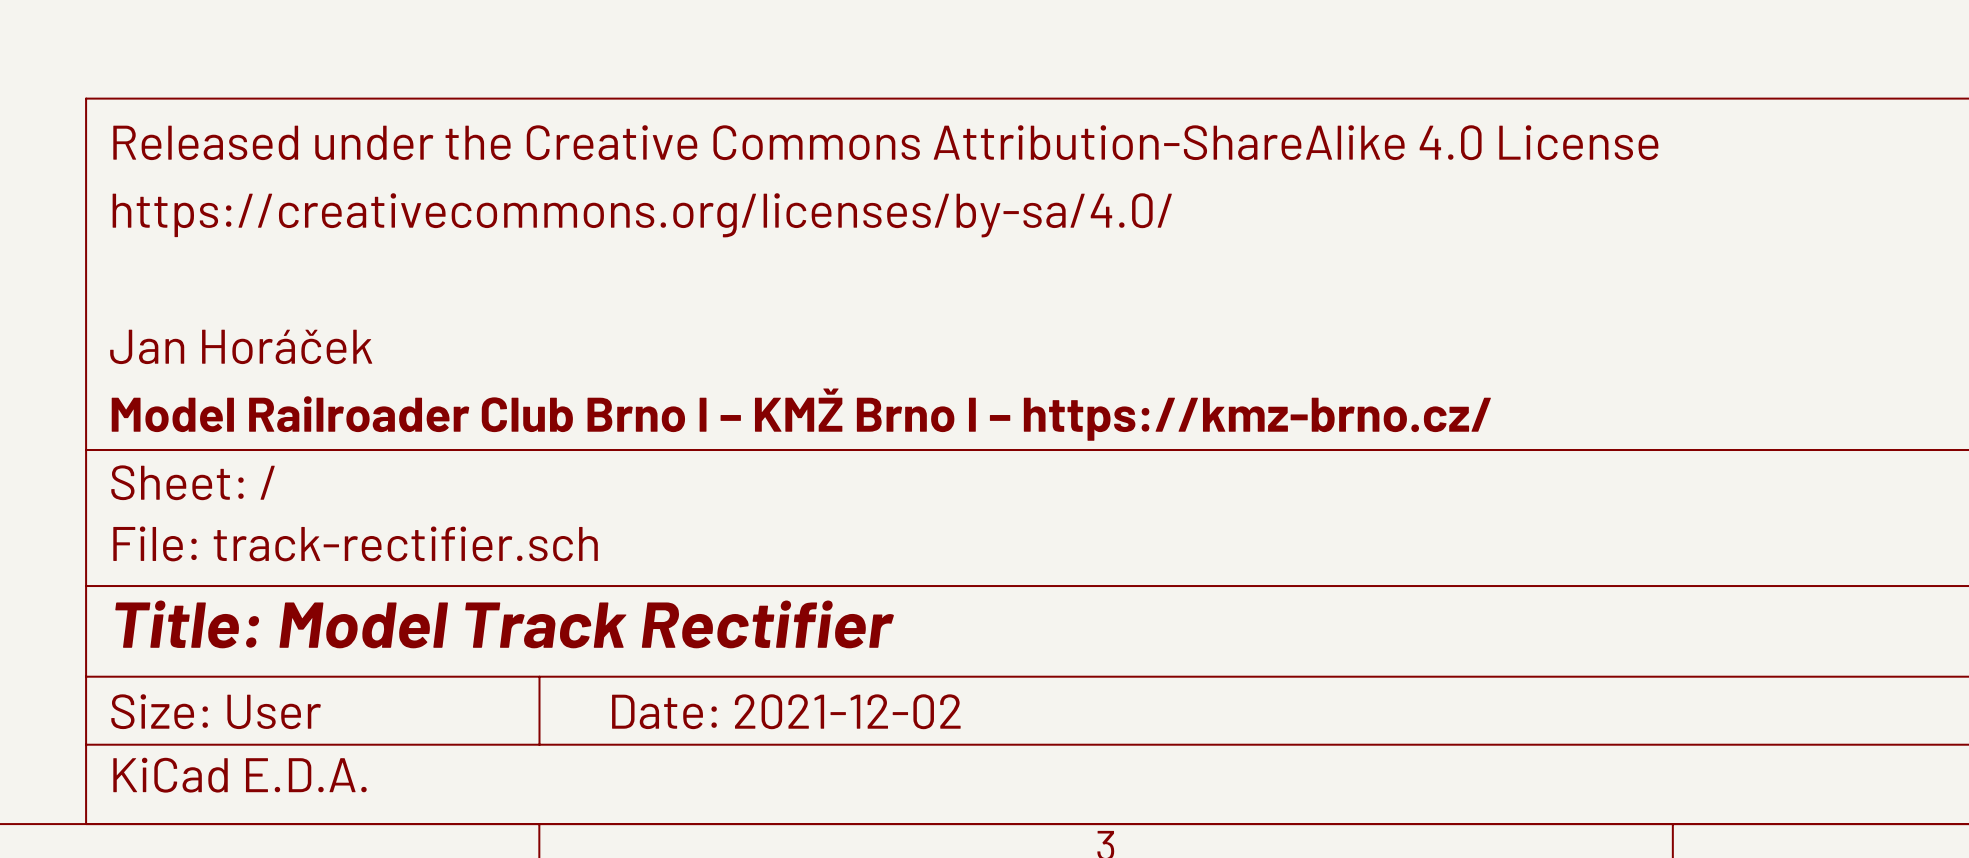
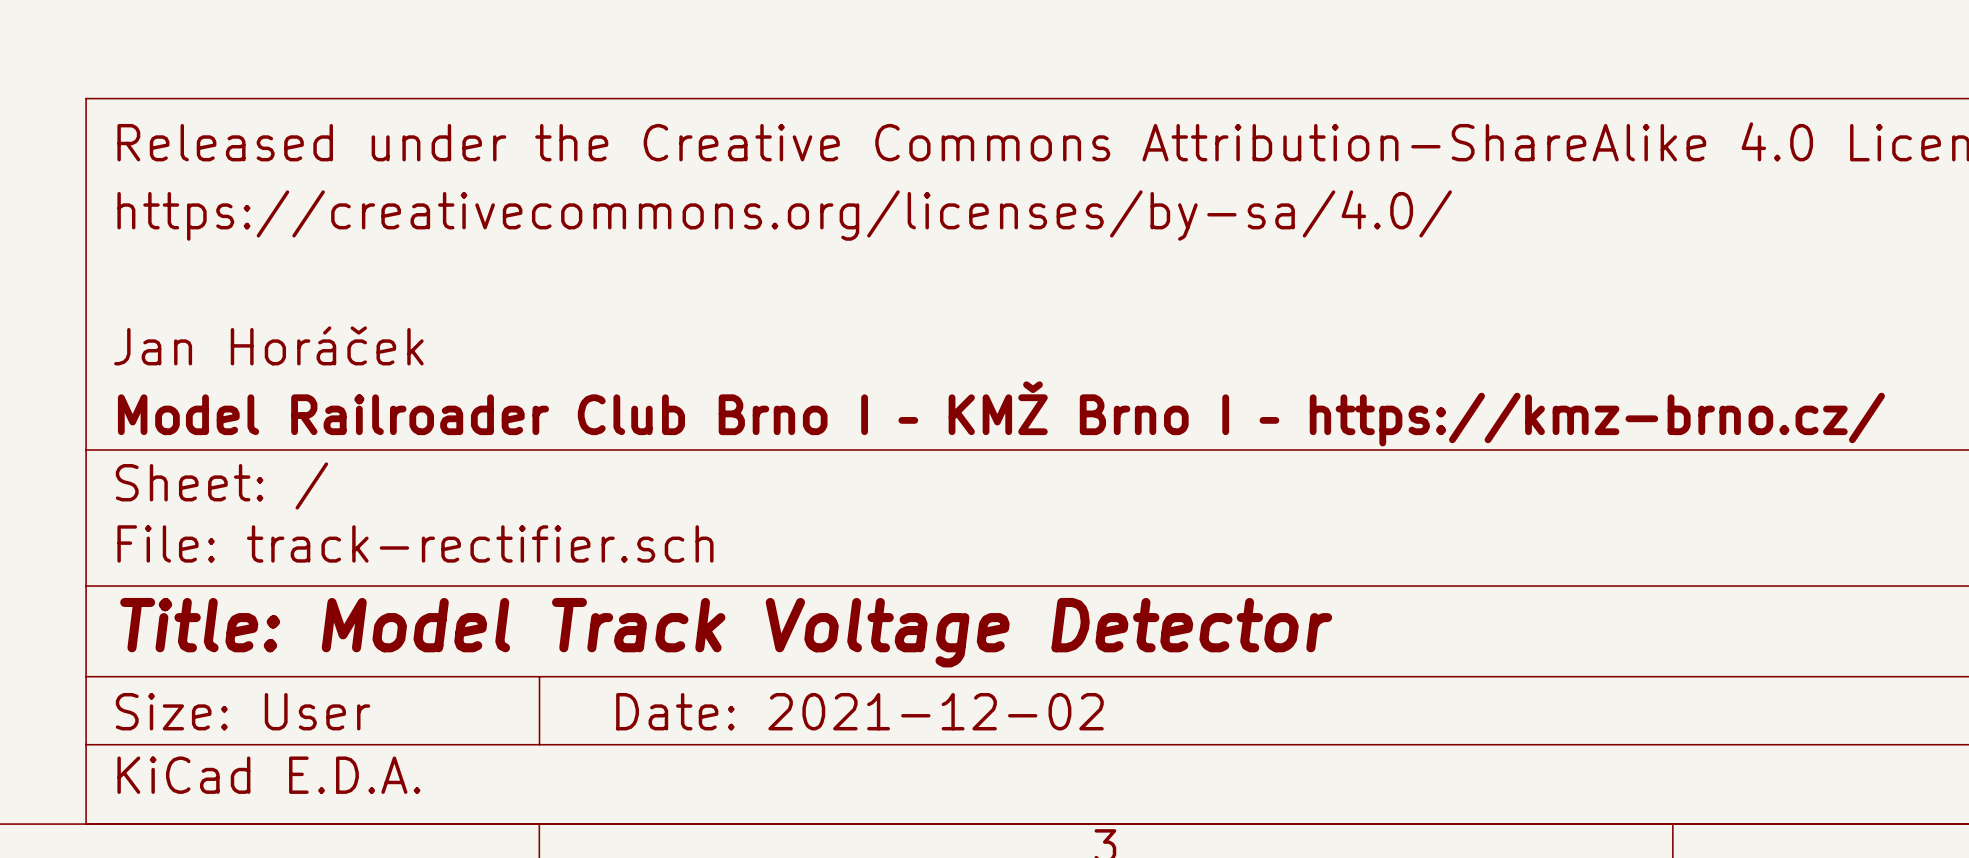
title block: Title: Model Track Rectifier (504, 624) -> Title: Model Track Voltage Detector (726, 632)

